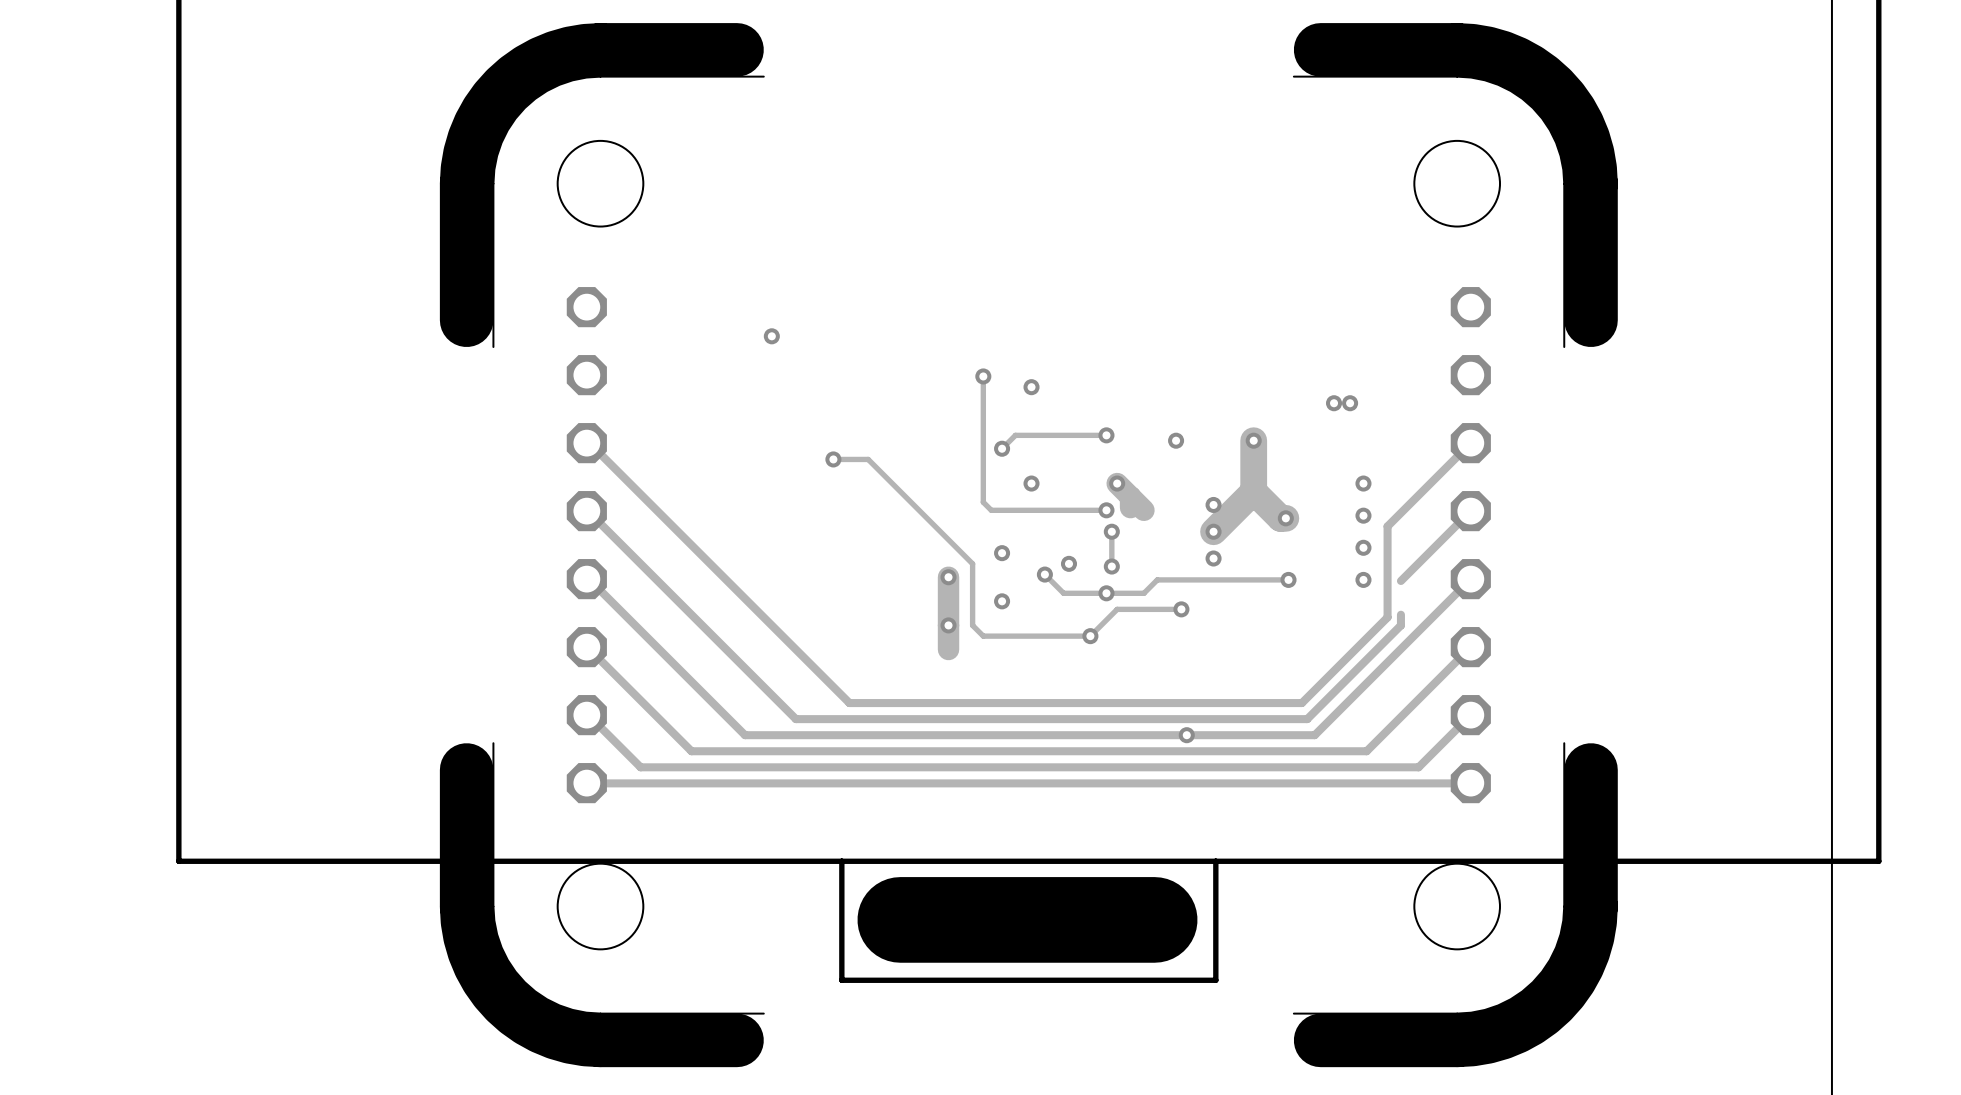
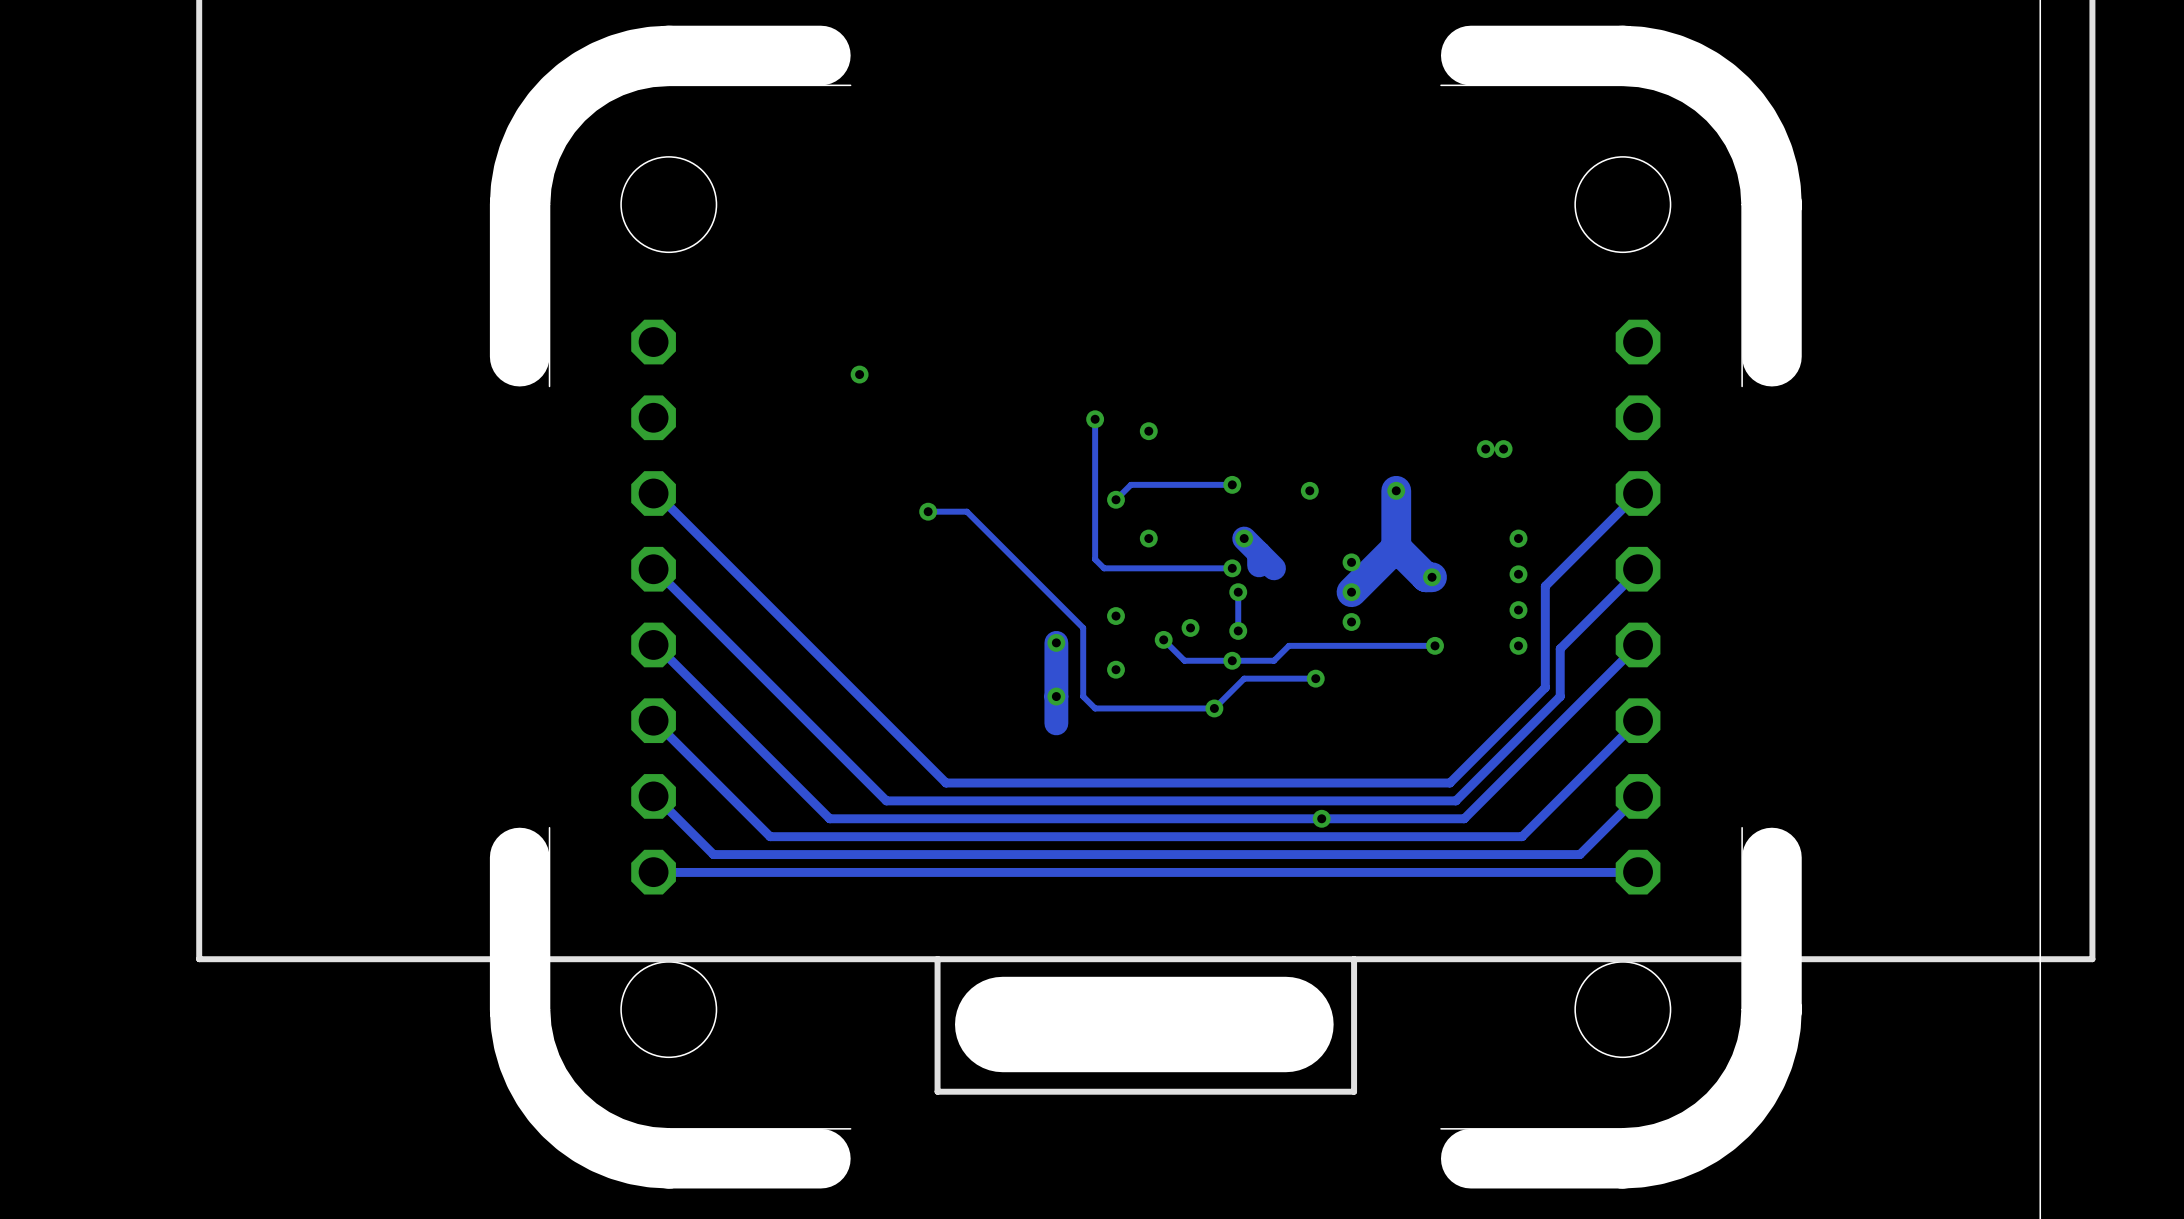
track: (1470, 511) (1400, 580) -> (1638, 569) (1560, 648) (1560, 684)

